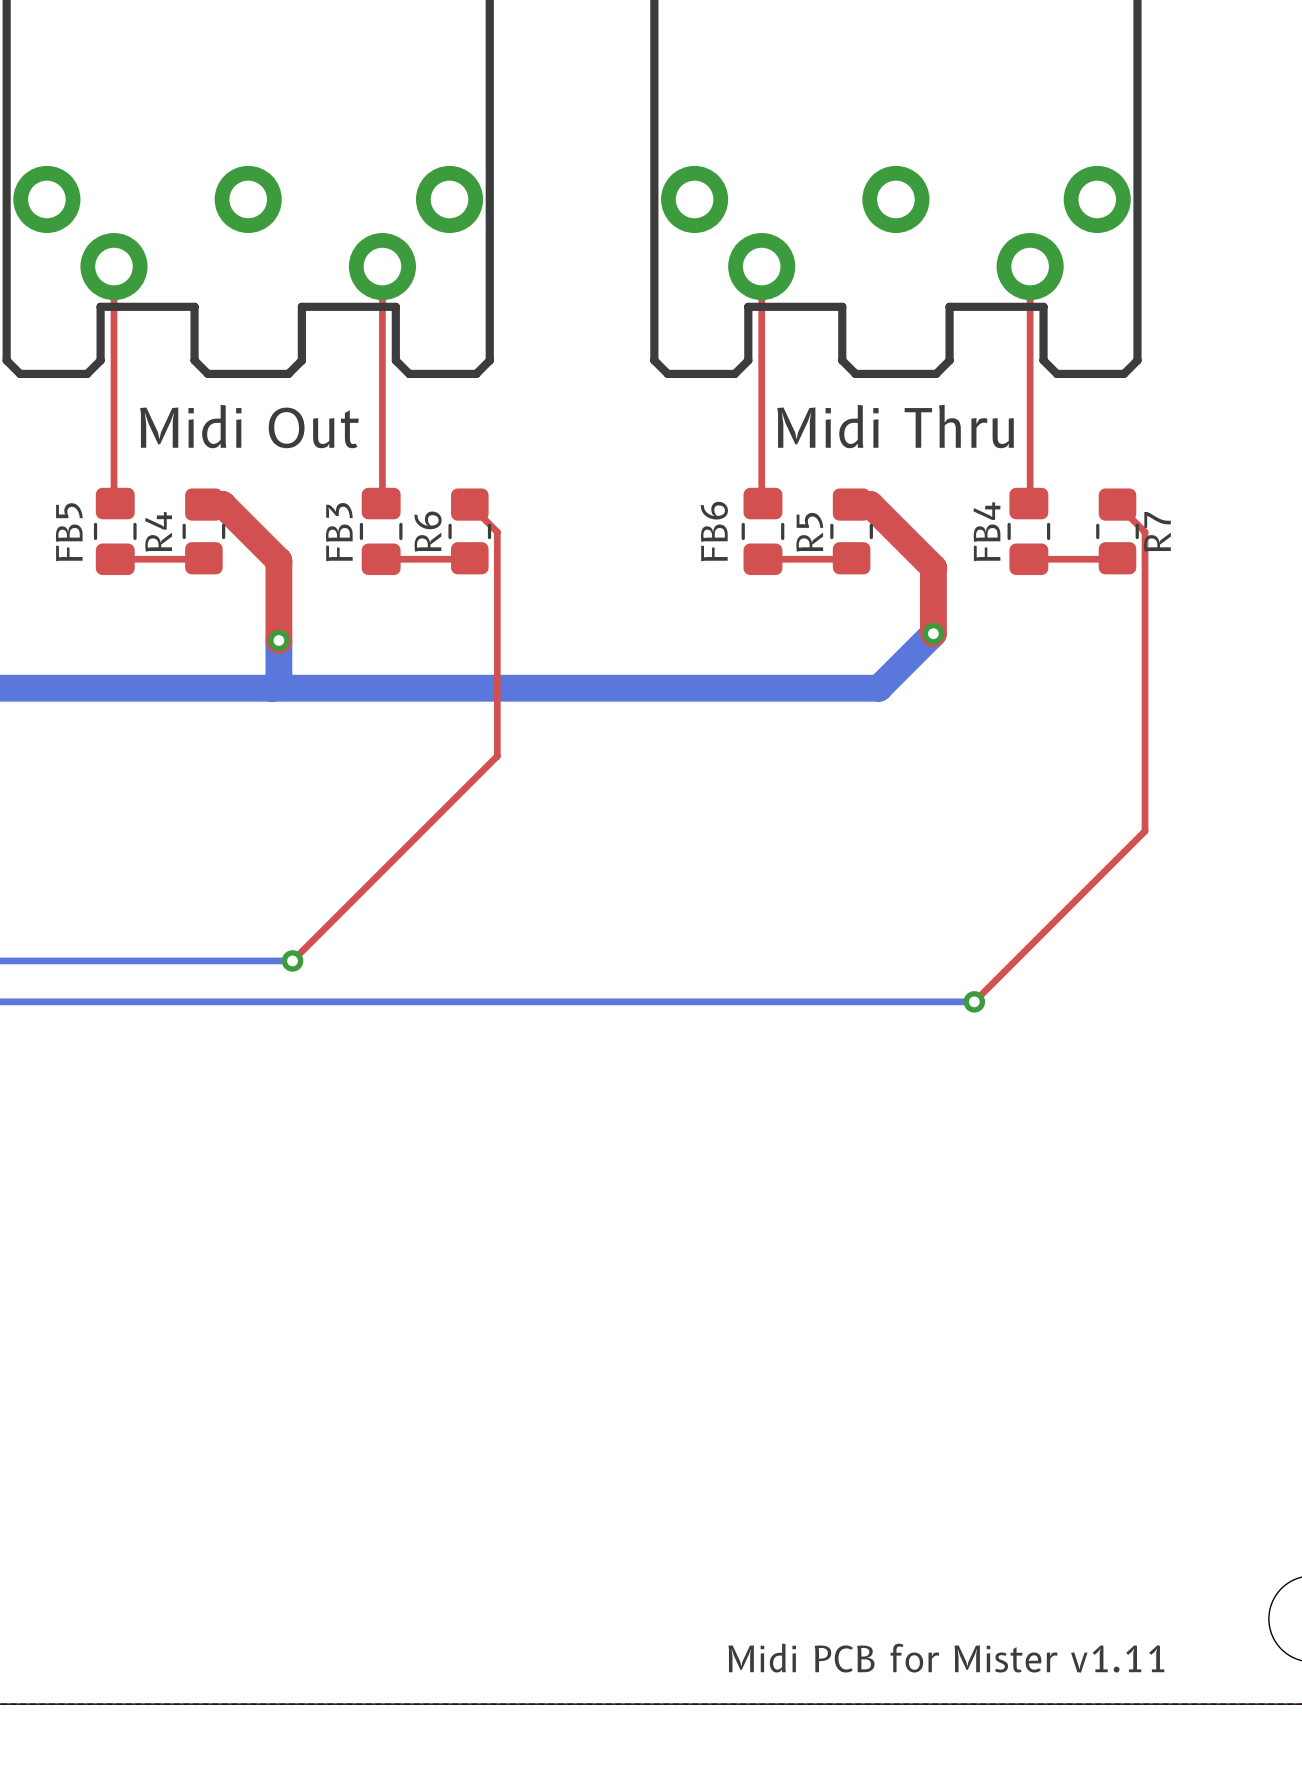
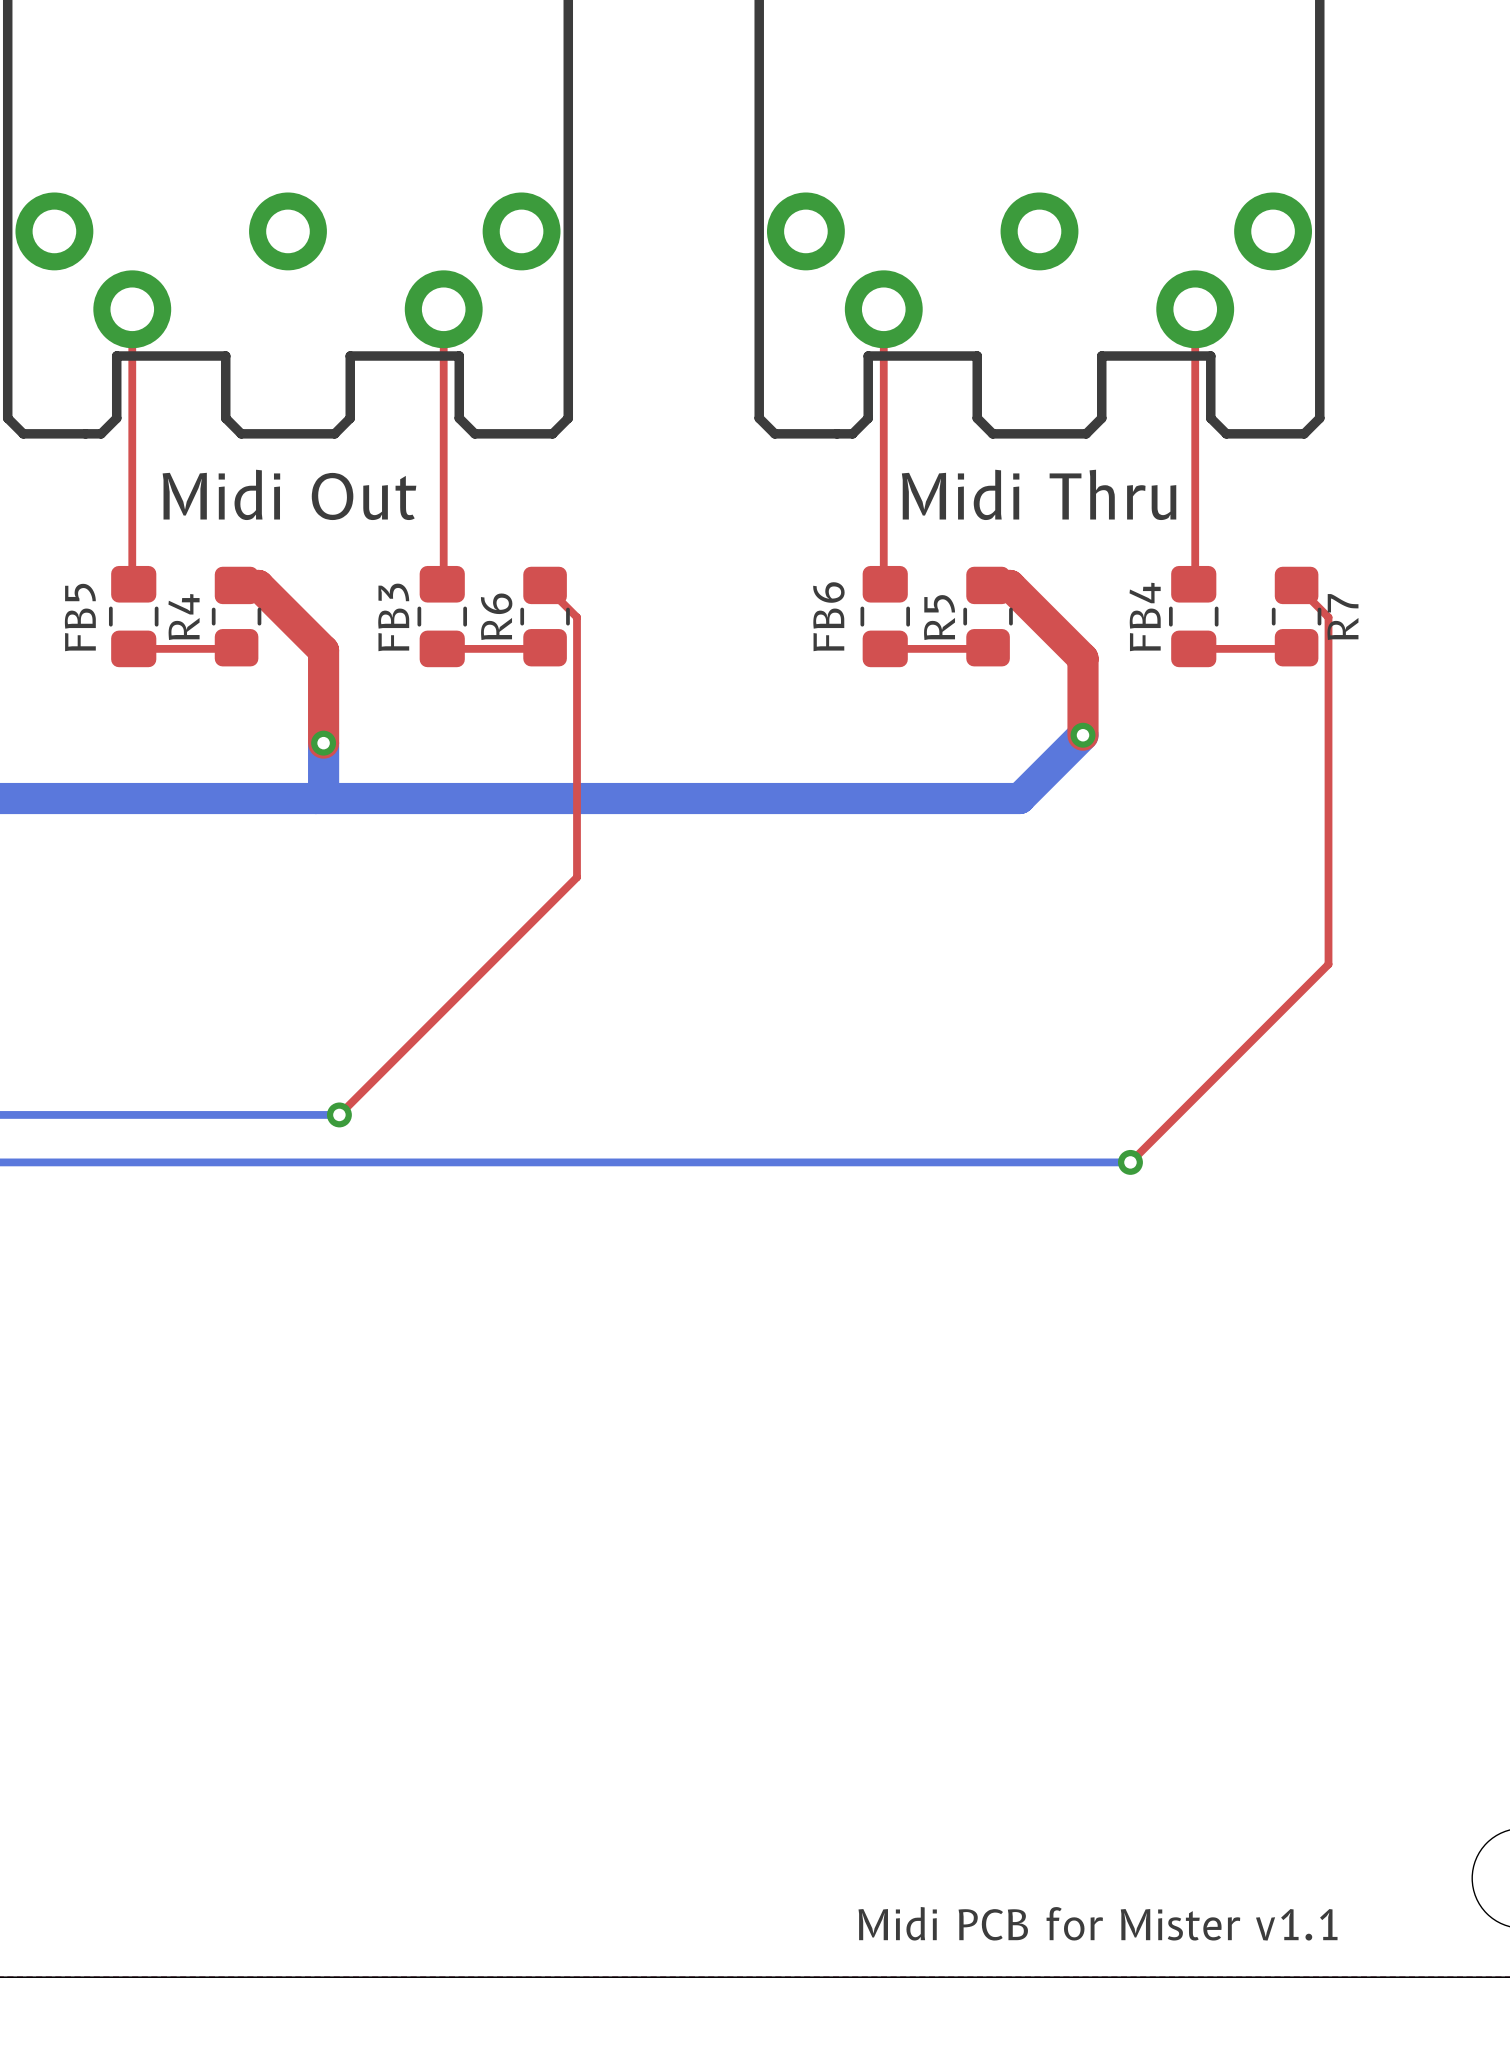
text: Midi PCB for Mister v1.11 (946, 1658) -> Midi PCB for Mister v1.1 (1098, 1923)

